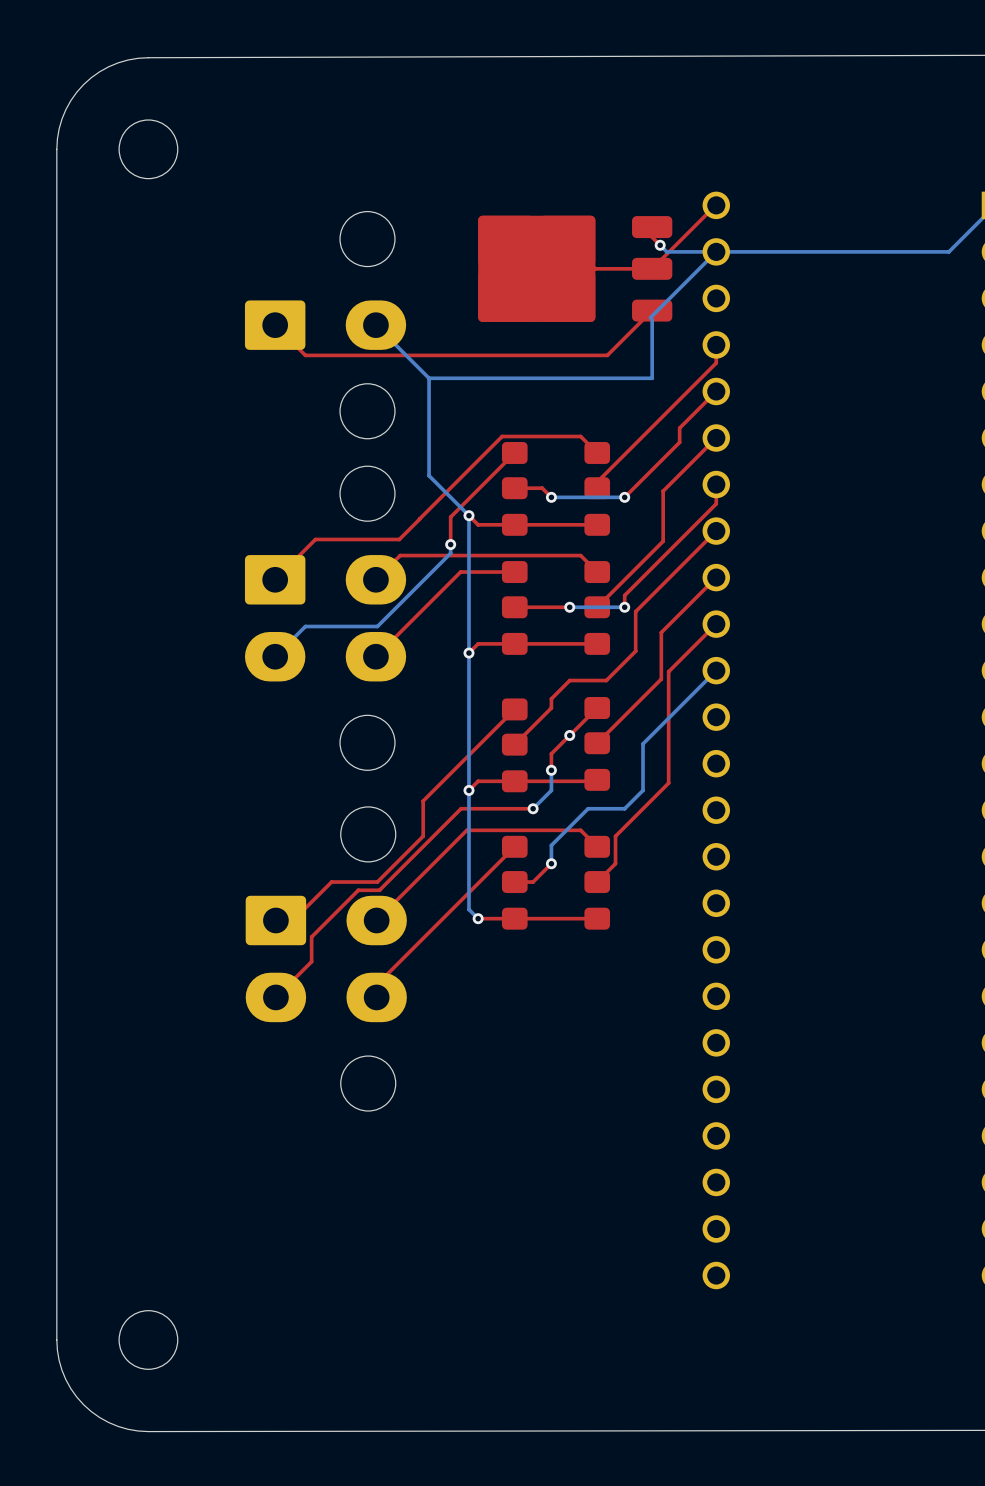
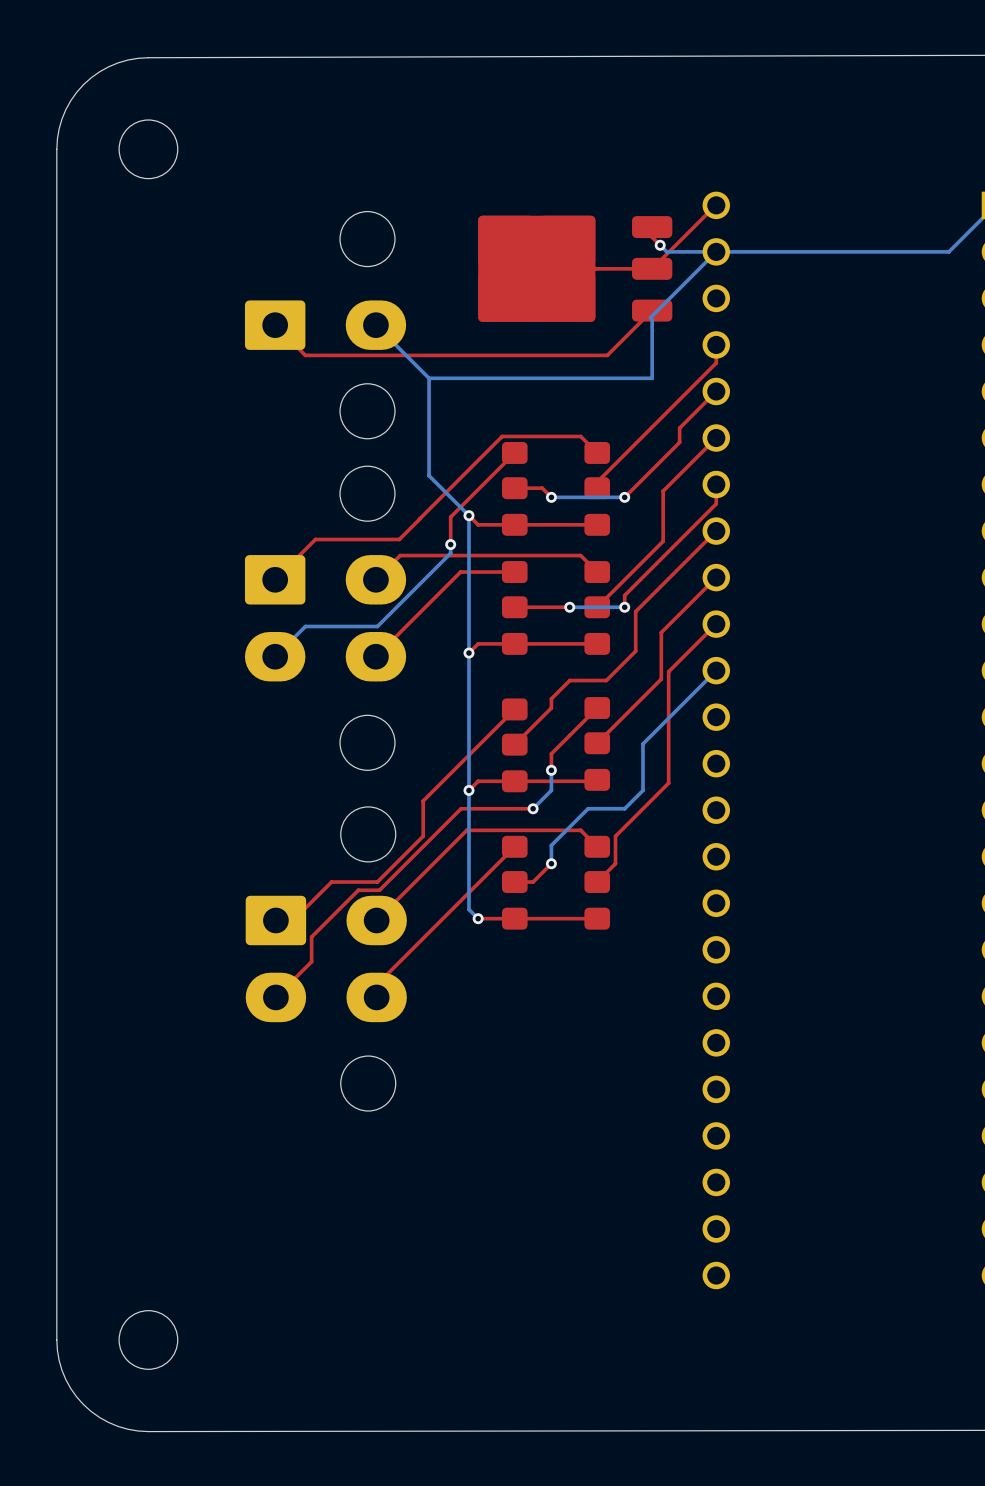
via: (569, 735) -> none

